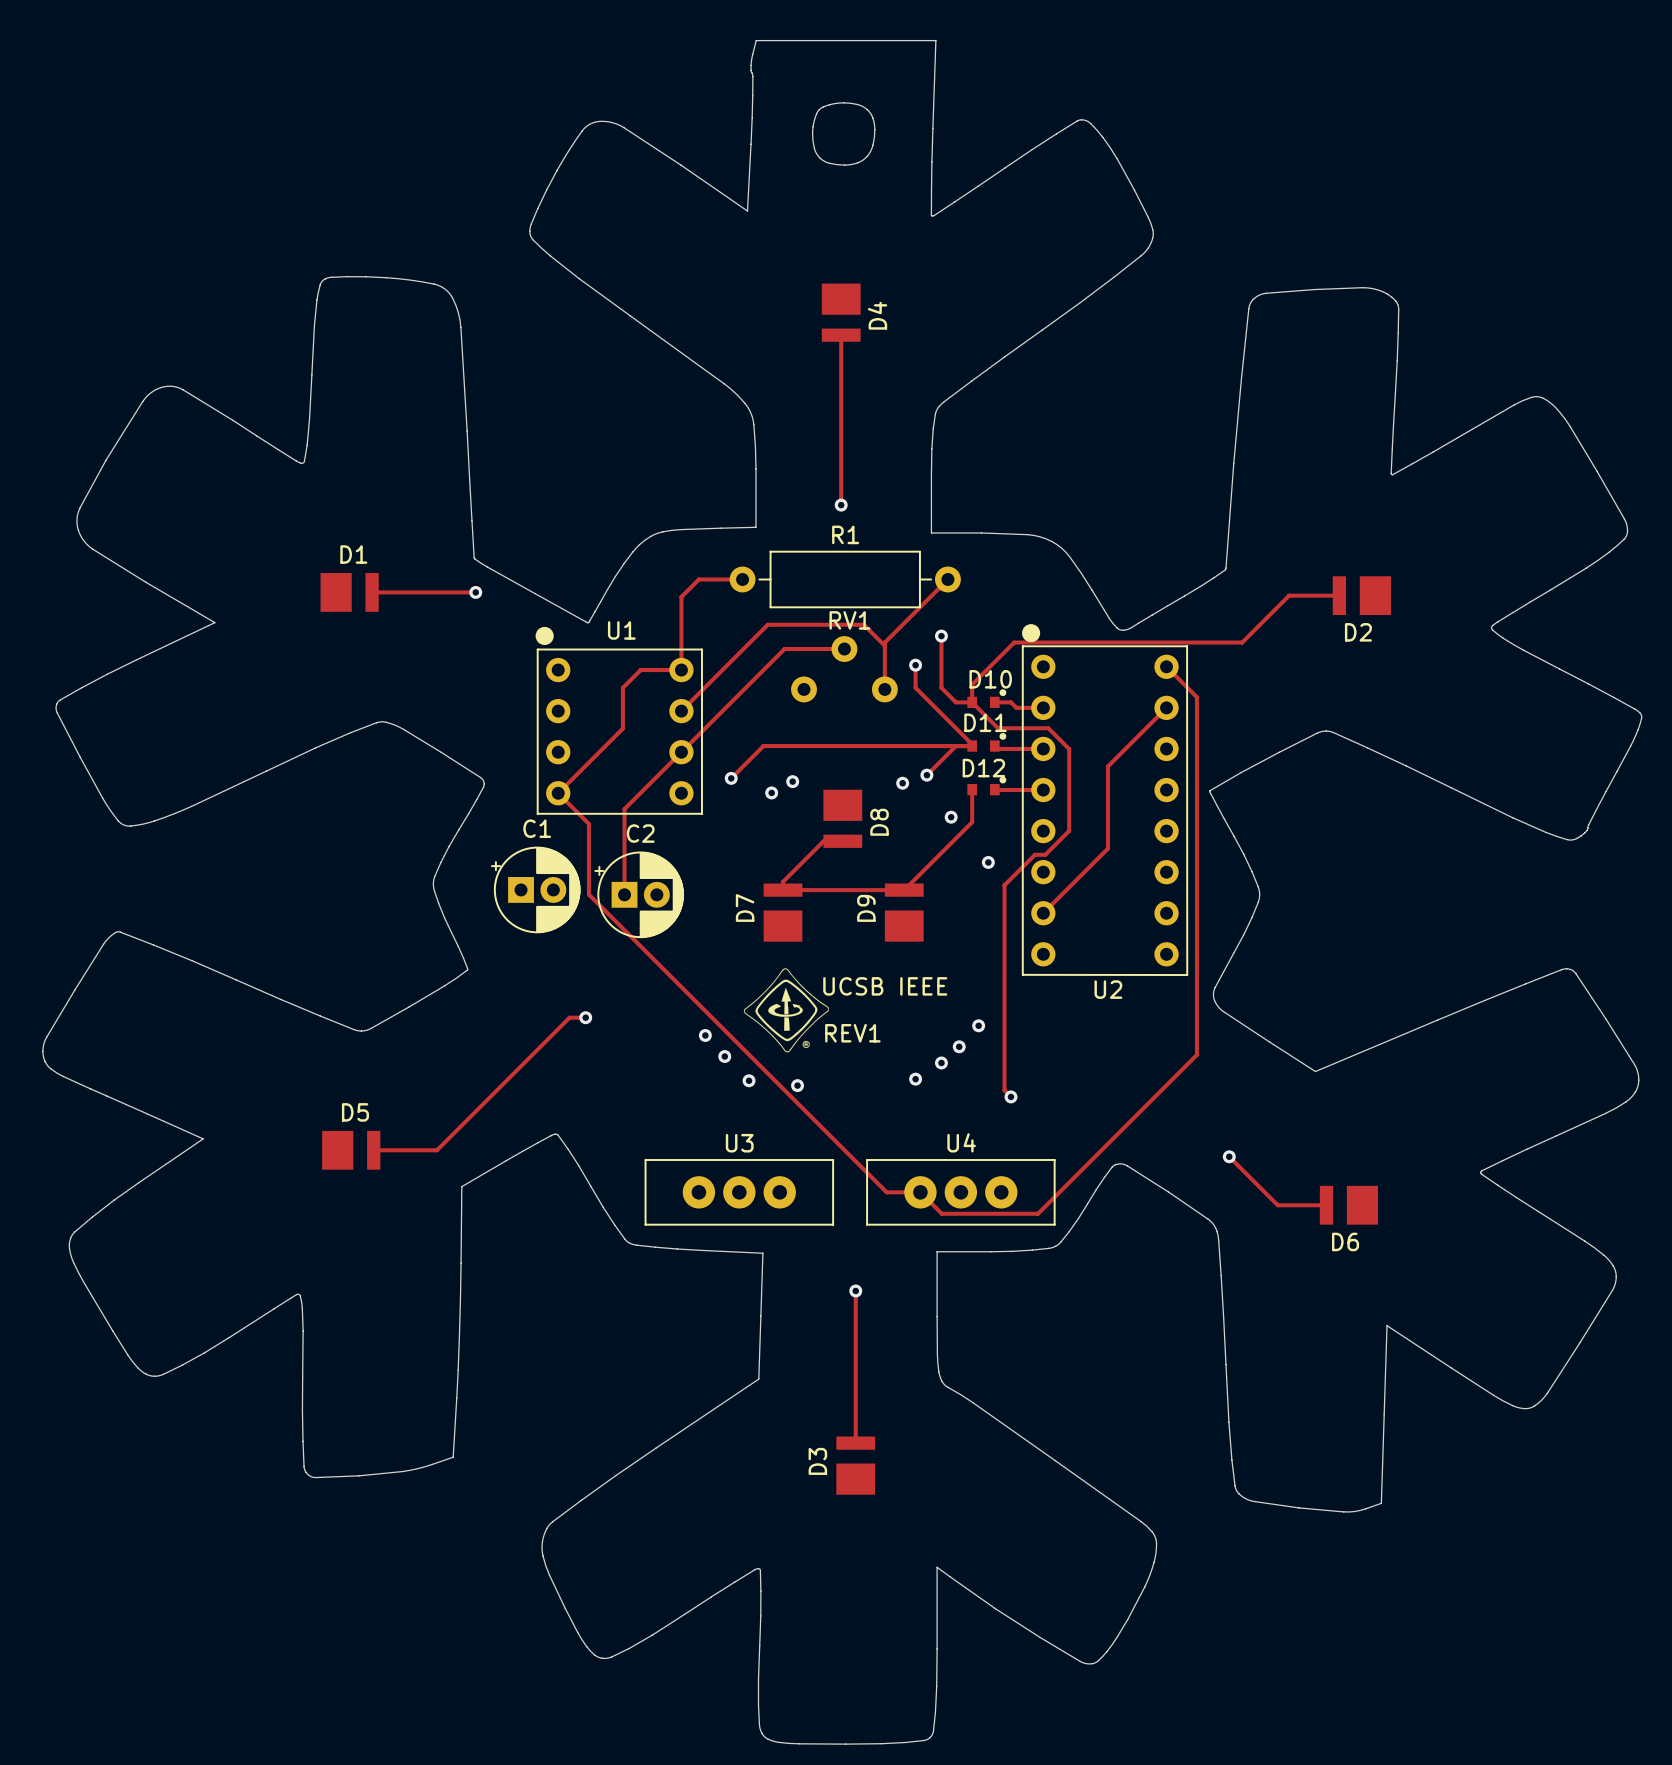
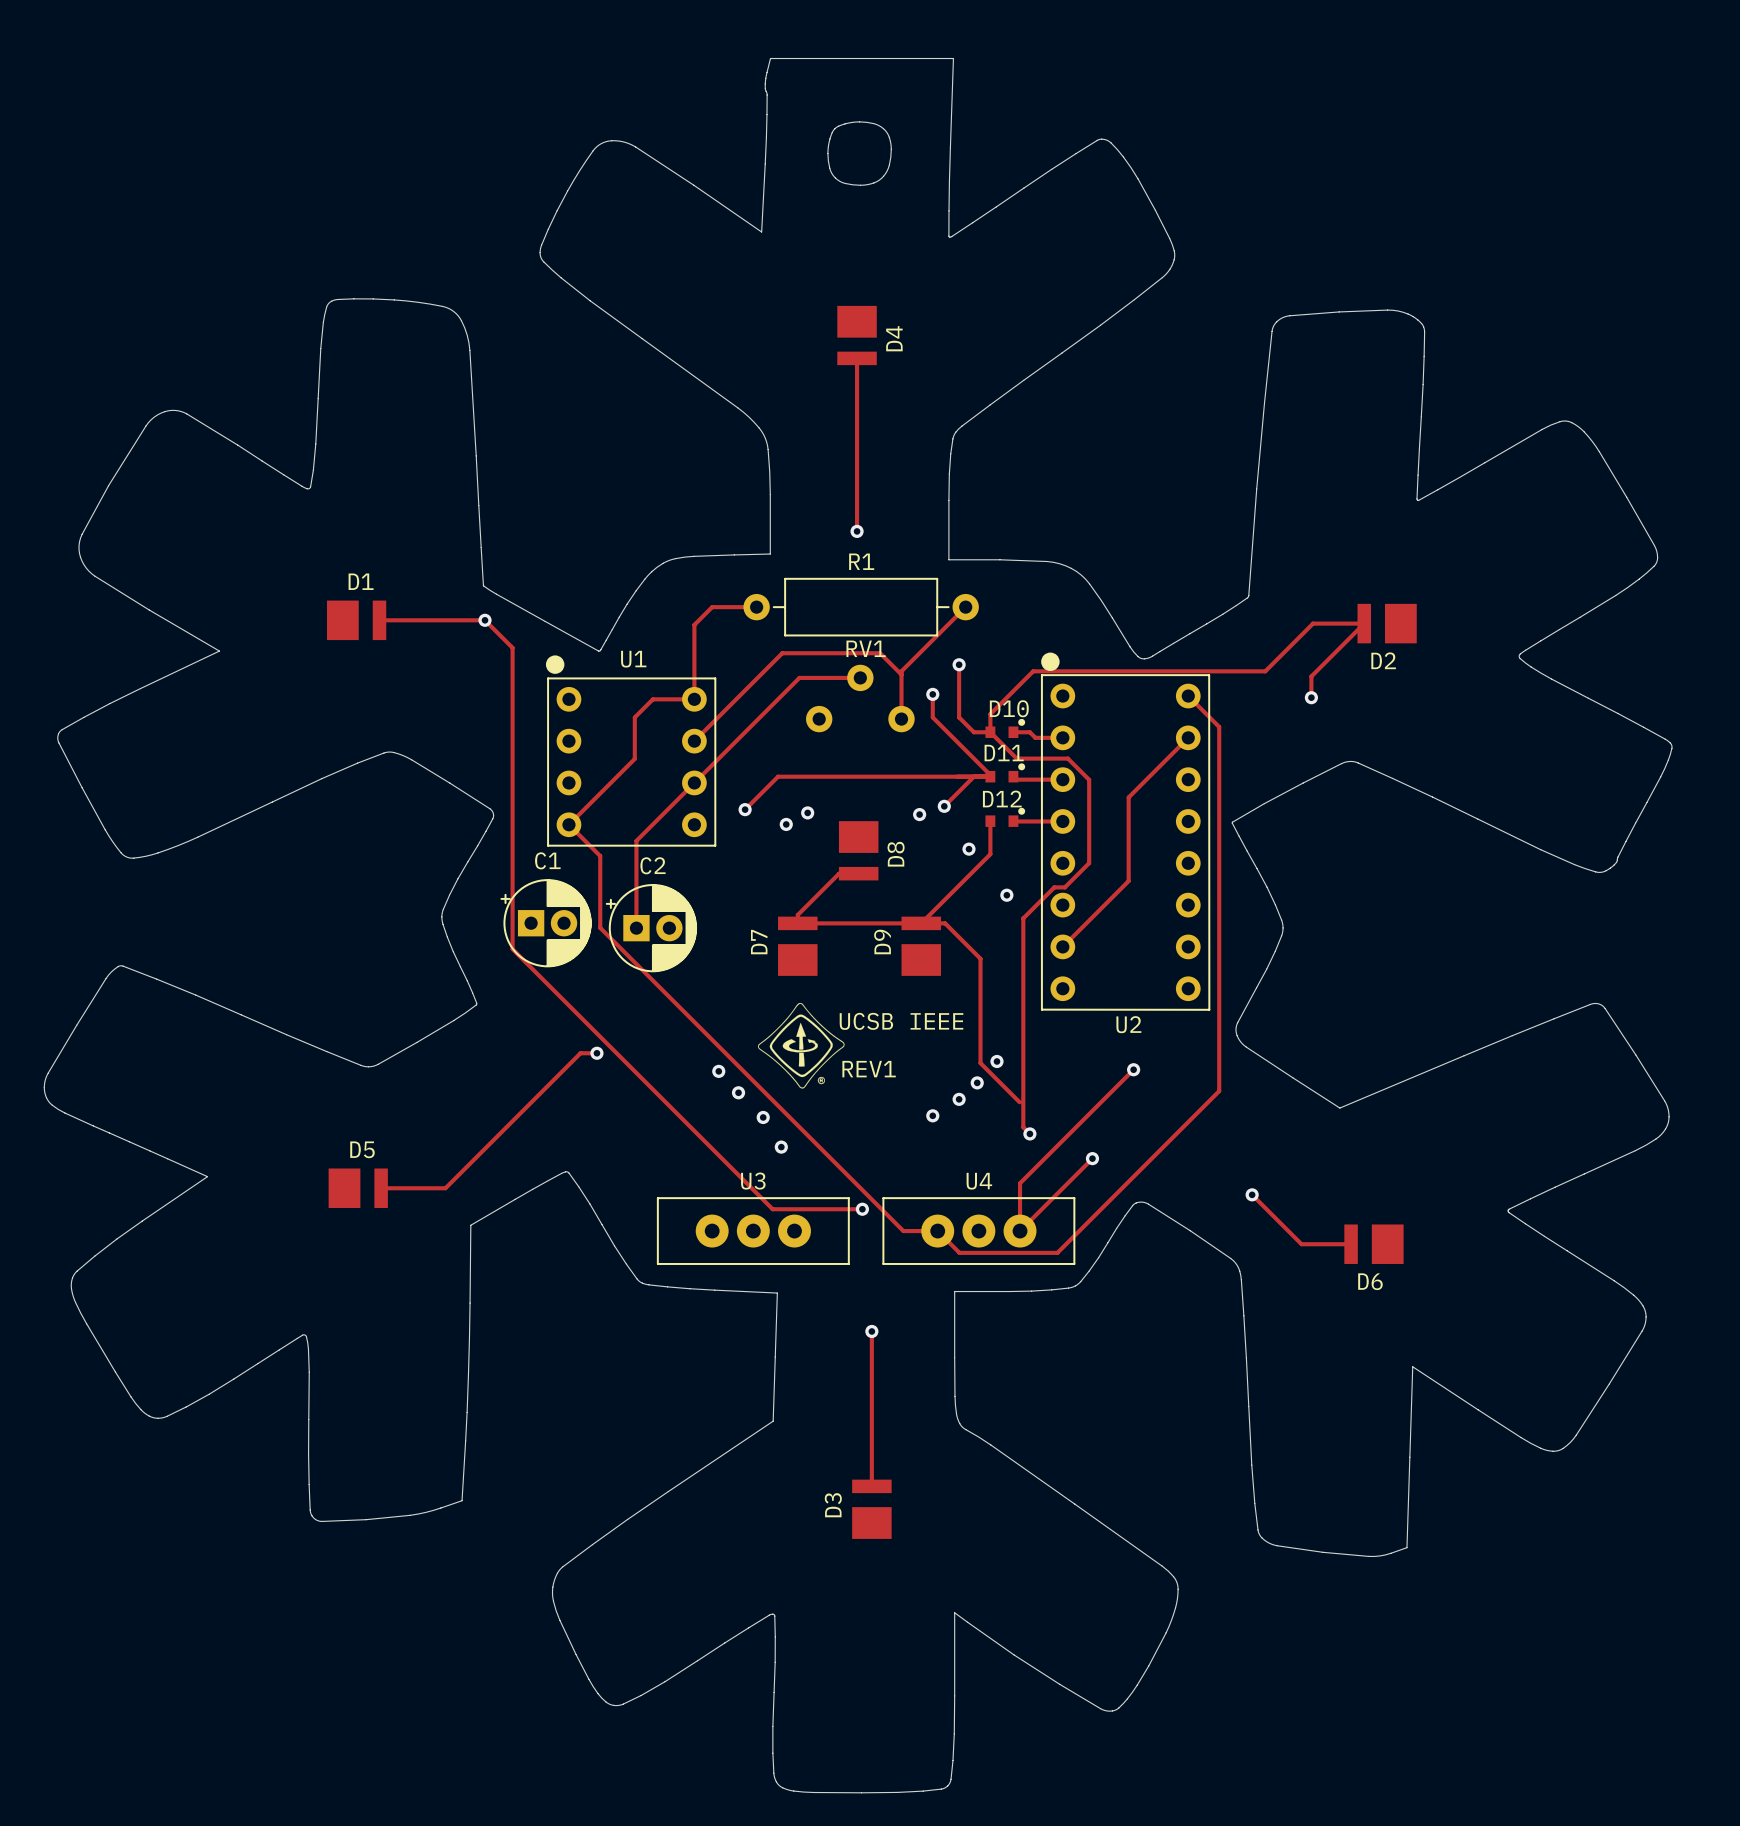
track: none -> (485, 620) (512, 647) (512, 949) (772, 1209) (862, 1209)
track: none -> (1364, 623) (1311, 676) (1311, 697)
via: none -> (1311, 697)
track: none -> (921, 923) (945, 923) (980, 958) (980, 1063) (1019, 1102)
track: none -> (1133, 1069) (1020, 1183) (1020, 1231) (1092, 1158)
via: none -> (1133, 1069)
via position: (797, 1085) -> (781, 1147)
via: none -> (1092, 1158)
via: none -> (862, 1209)

